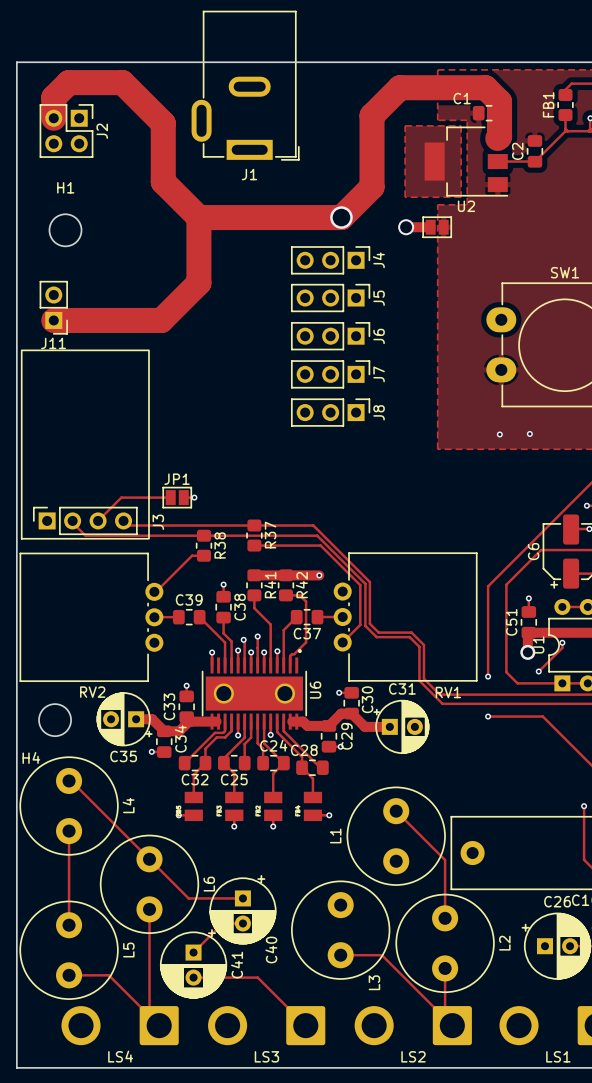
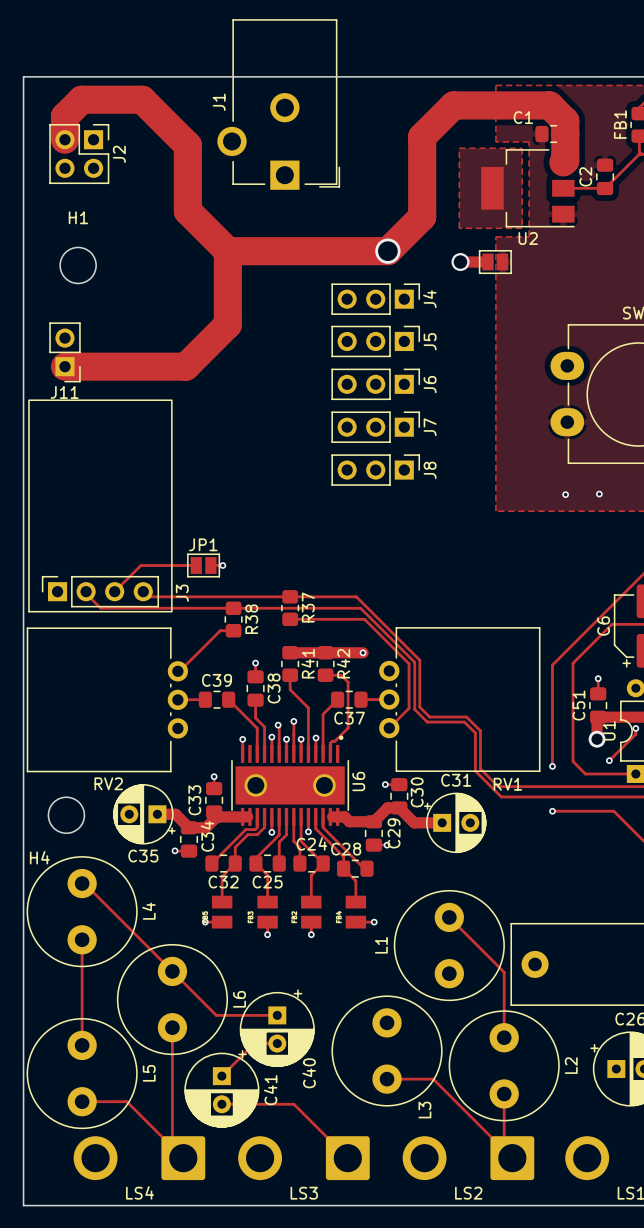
J1 footprint: [191, 10, 300, 161] -> [217, 19, 341, 190]
J1 name position: J1 (249, 174) -> J1 (219, 102)

